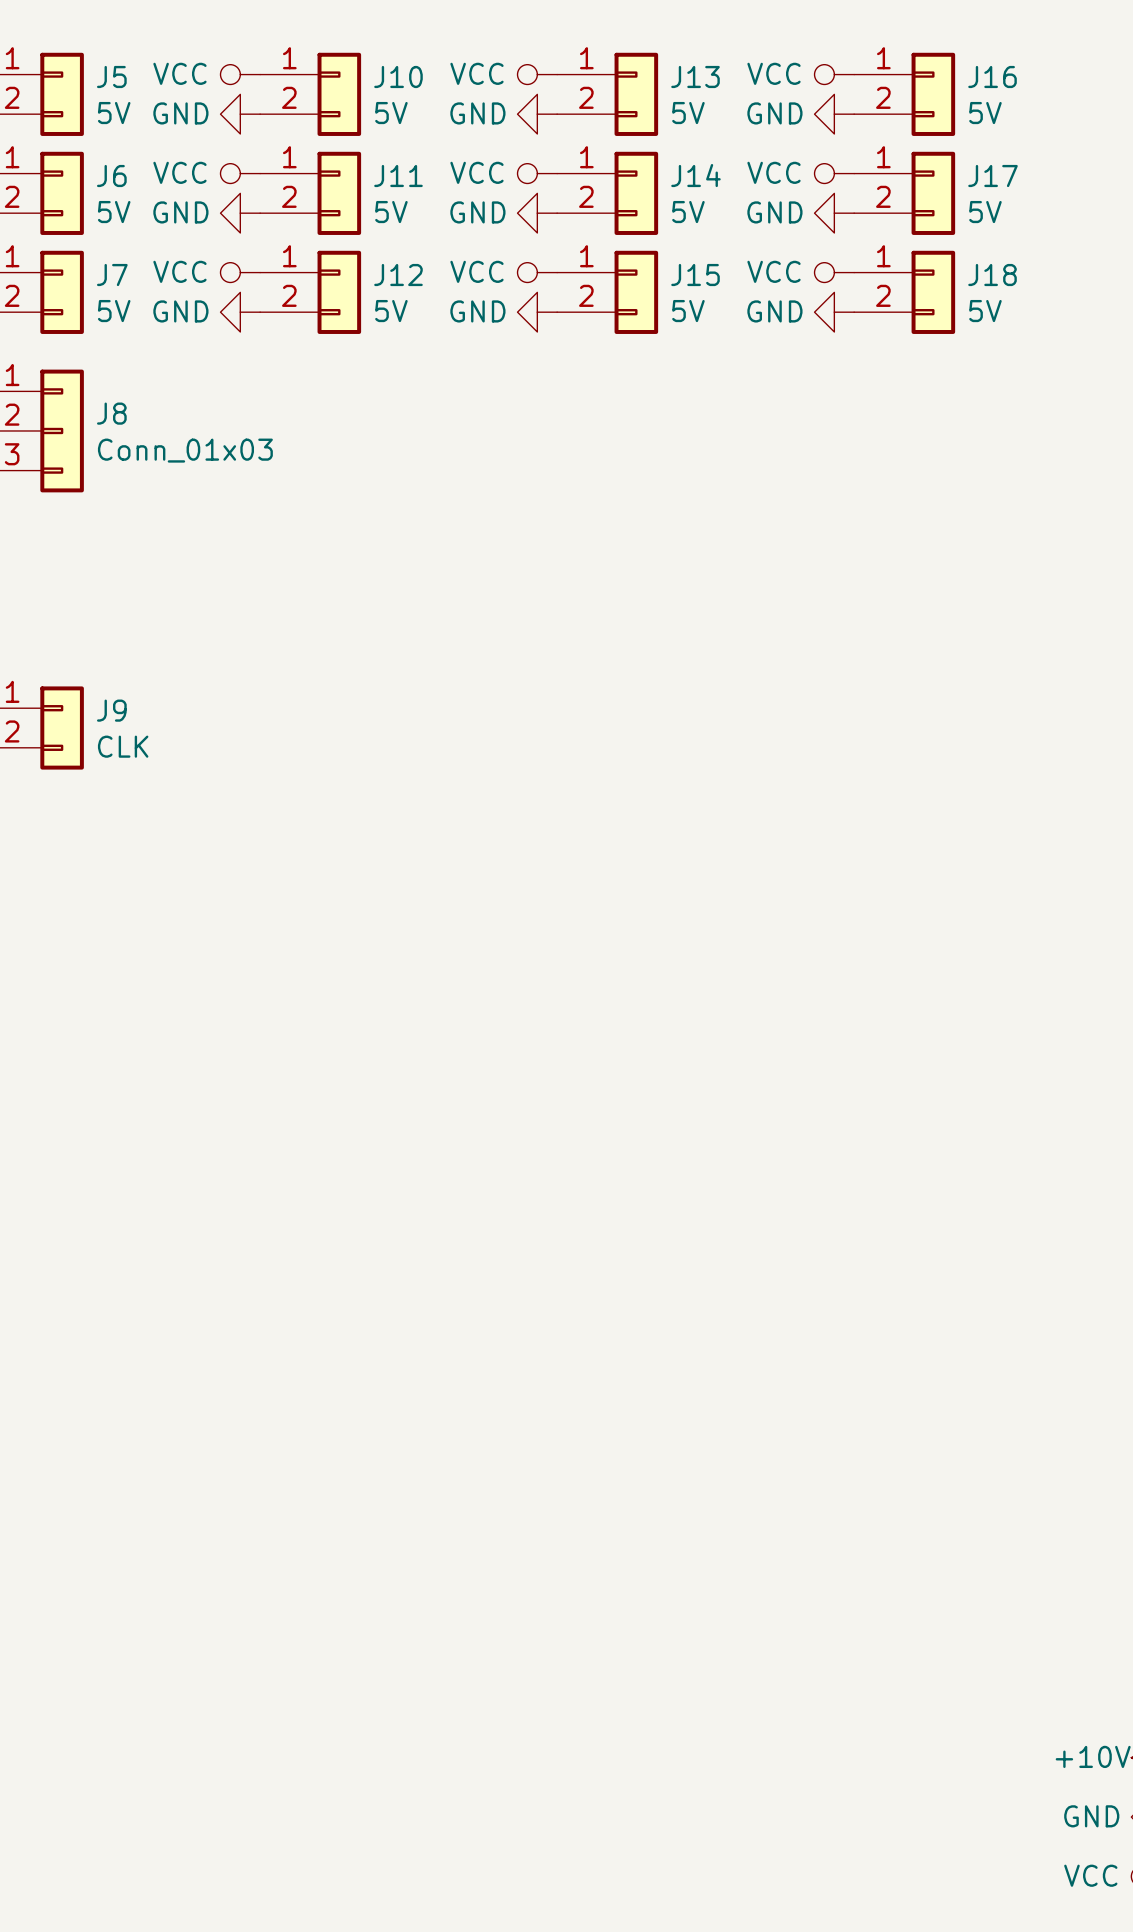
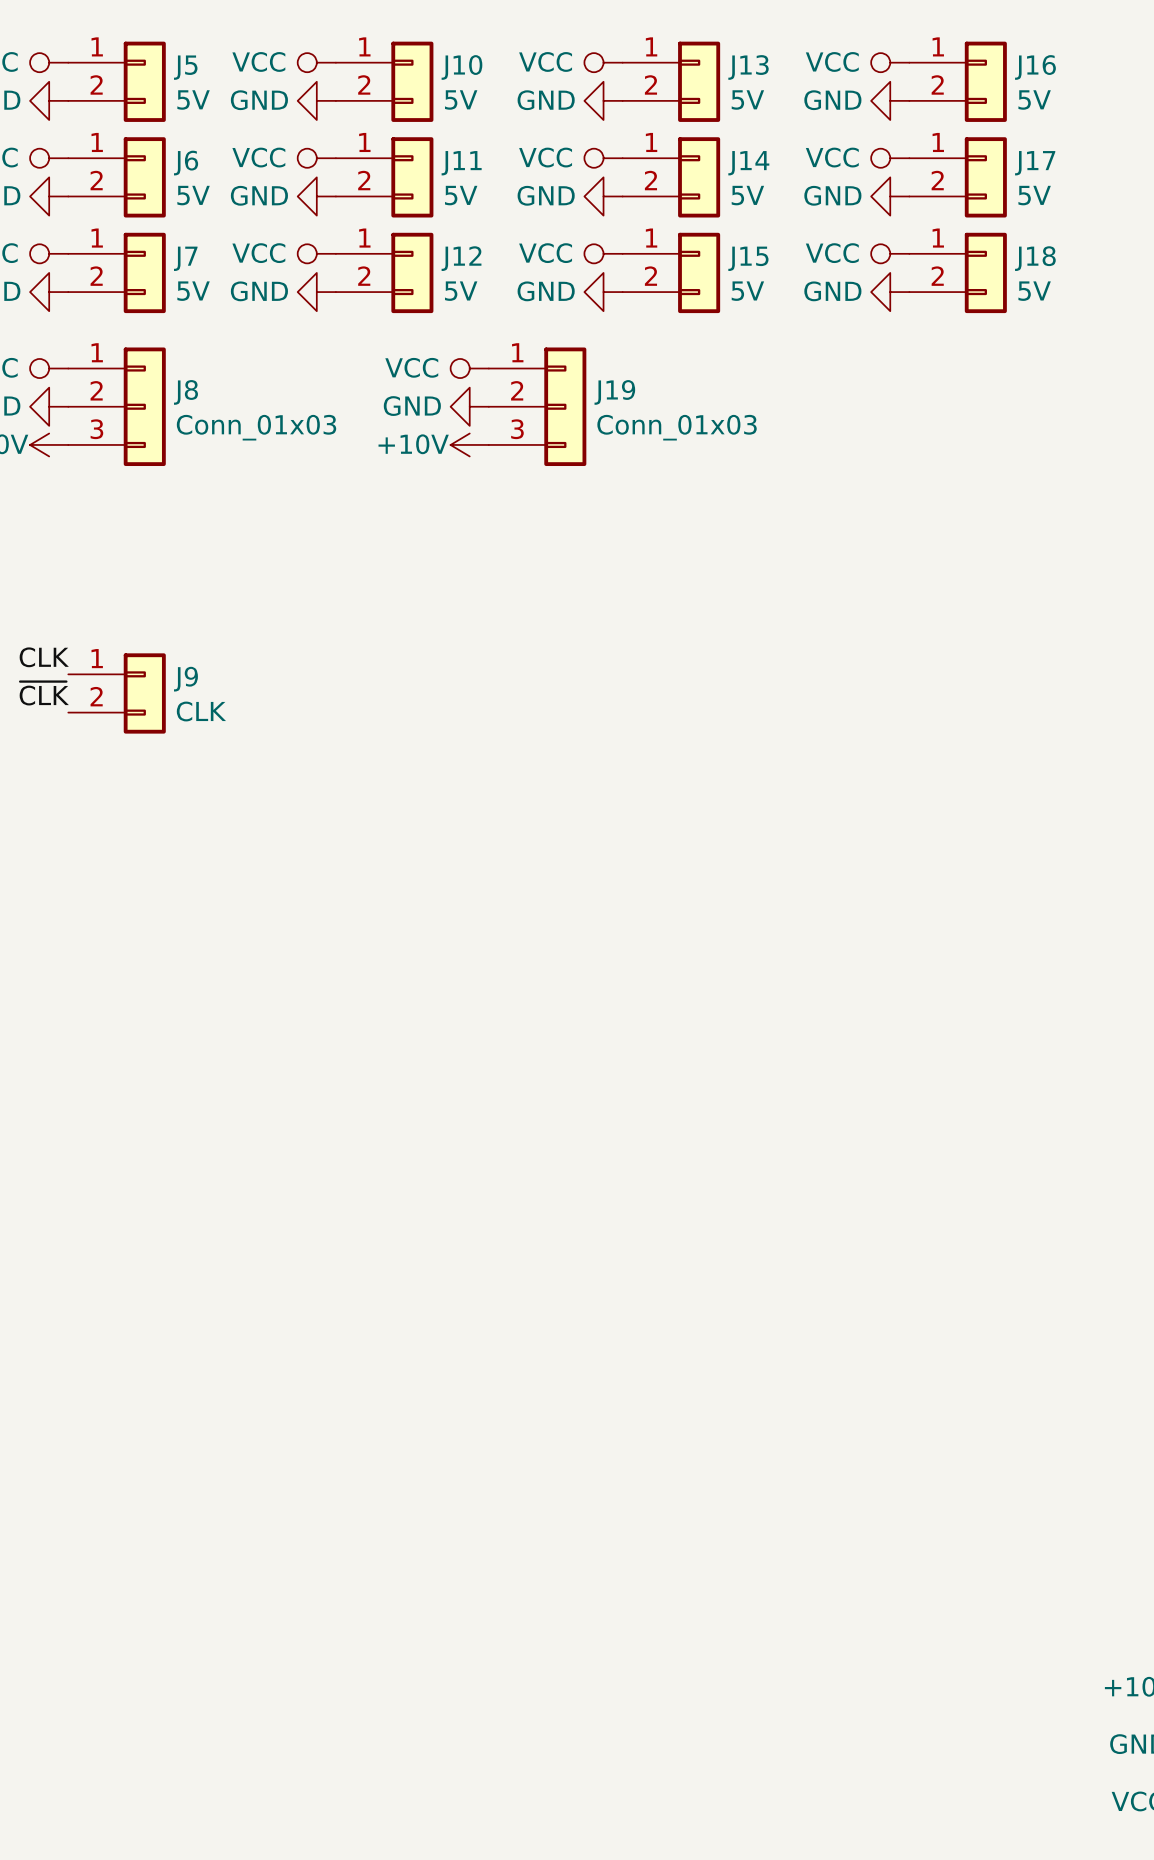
power symbol: none -> VCC (469, 368)
power symbol: none -> GND (469, 406)
J19: none -> Conn_01x03 (537, 406)
power symbol: none -> +10V (469, 444)

